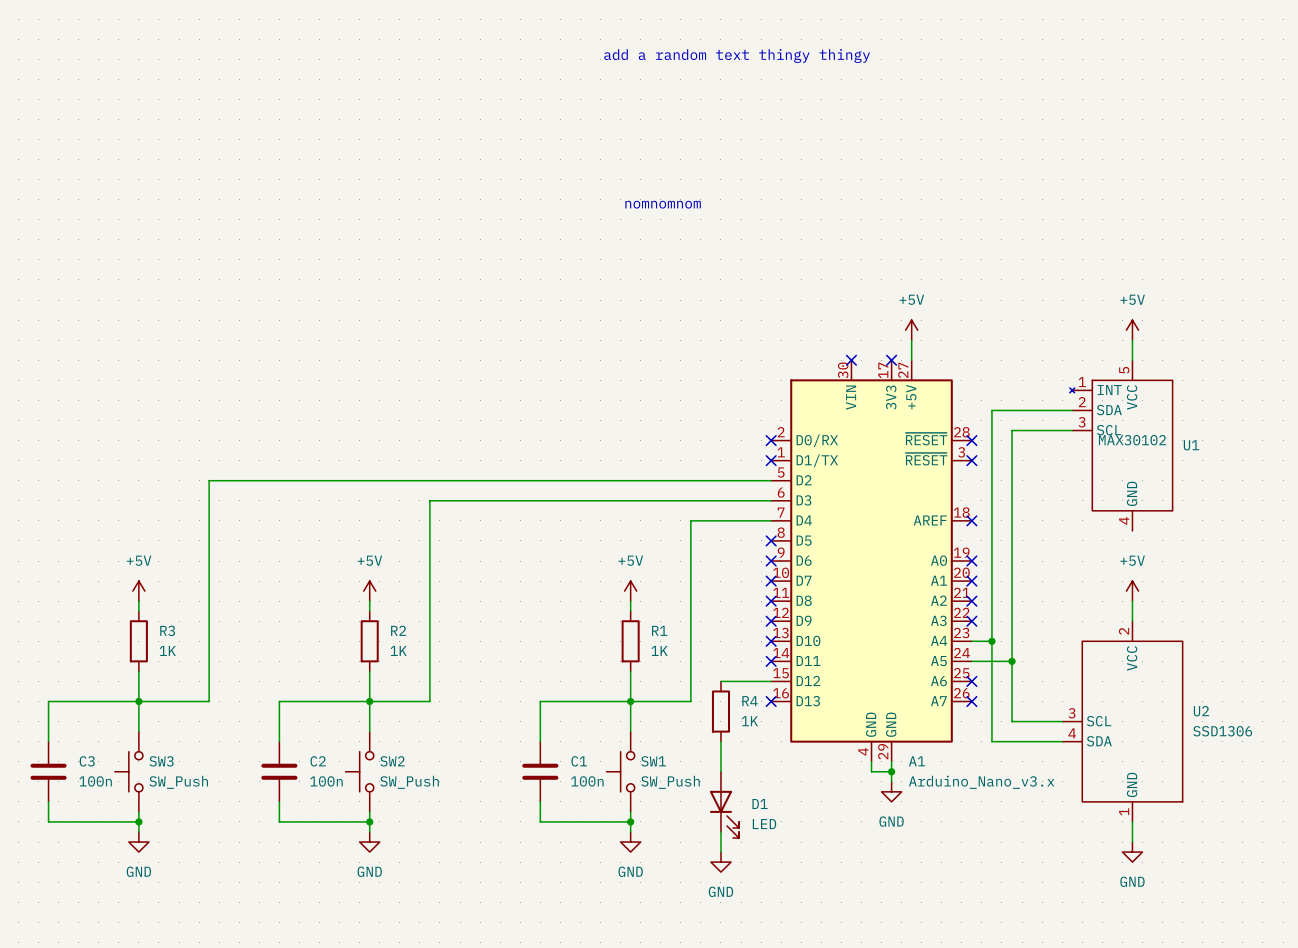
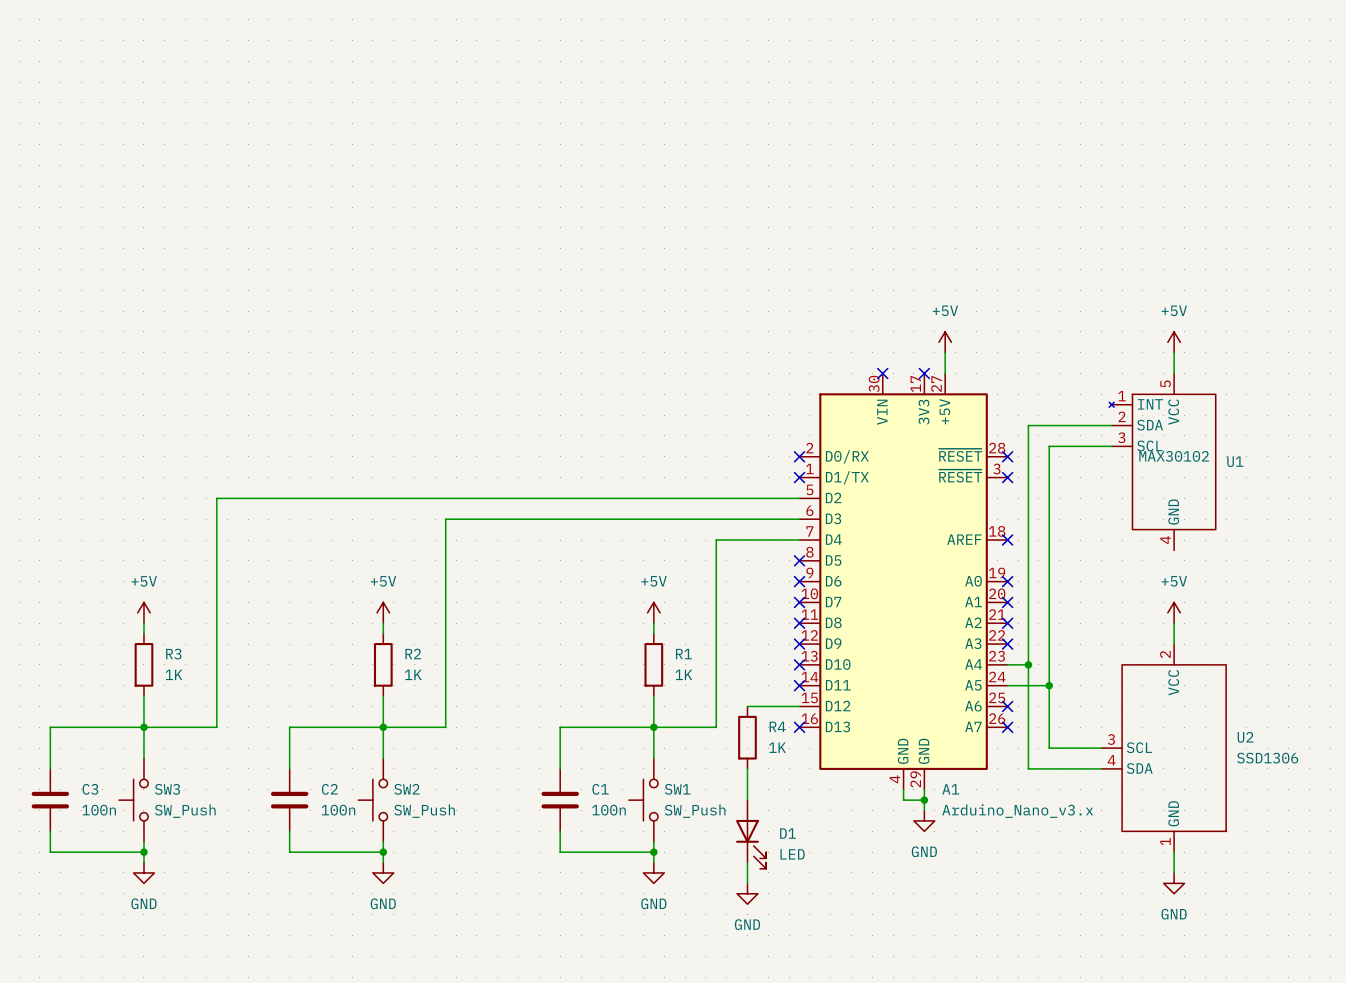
text: add a random text thingy thingy (737, 56) -> none
text: nomnomnom (663, 204) -> none

